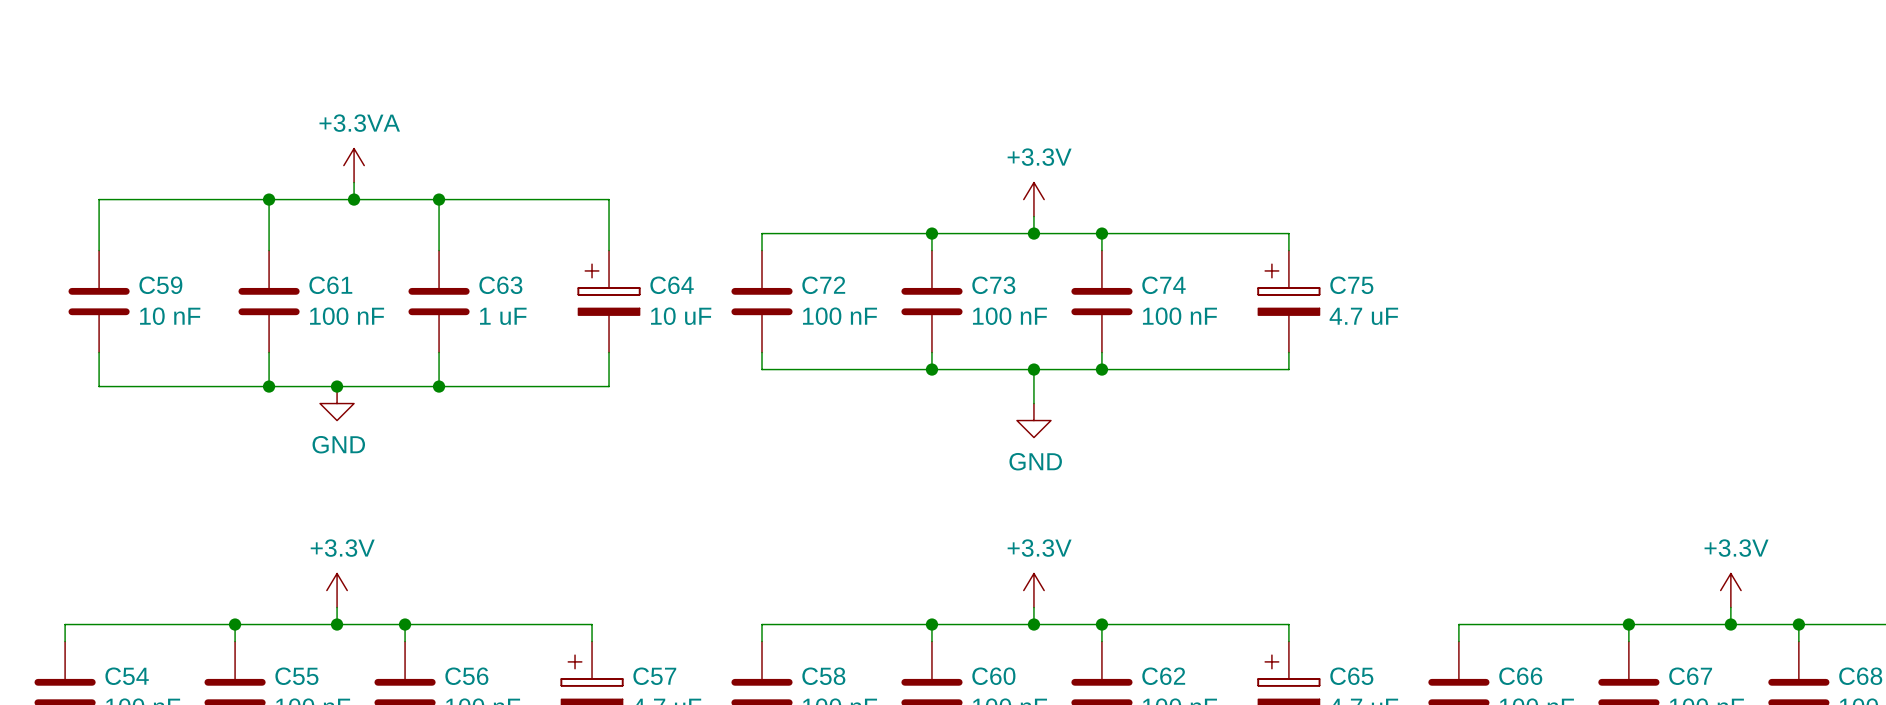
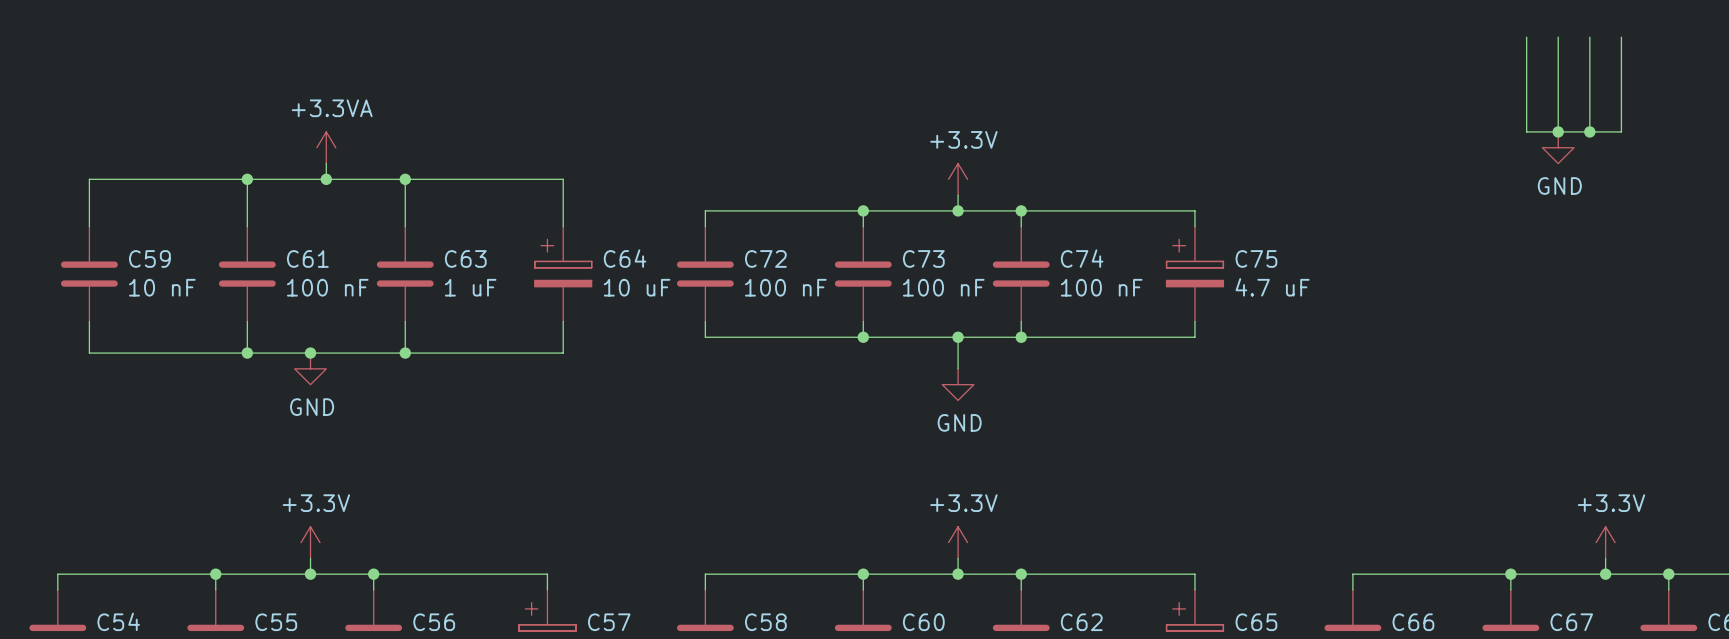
wire: none -> (1526, 37) (1526, 131) (1621, 131) (1621, 37)
wire: none -> (1558, 37) (1558, 131)
wire: none -> (1589, 37) (1589, 131)
junction: none -> (1558, 131)
junction: none -> (1589, 131)
power symbol: none -> GND (1558, 147)

